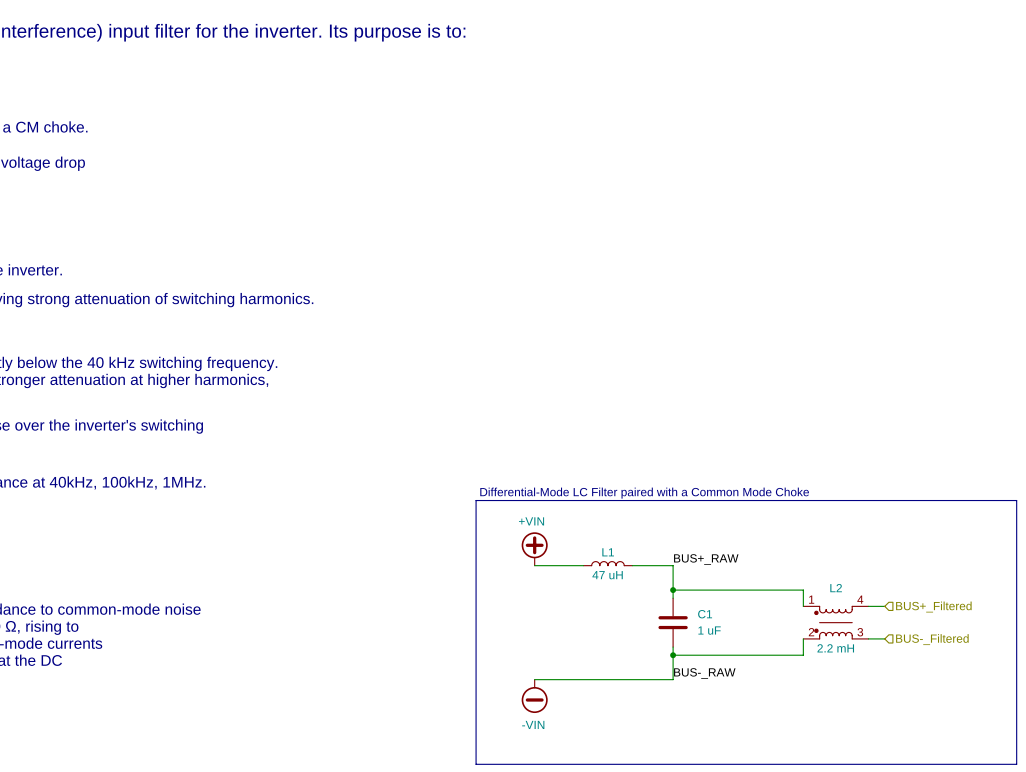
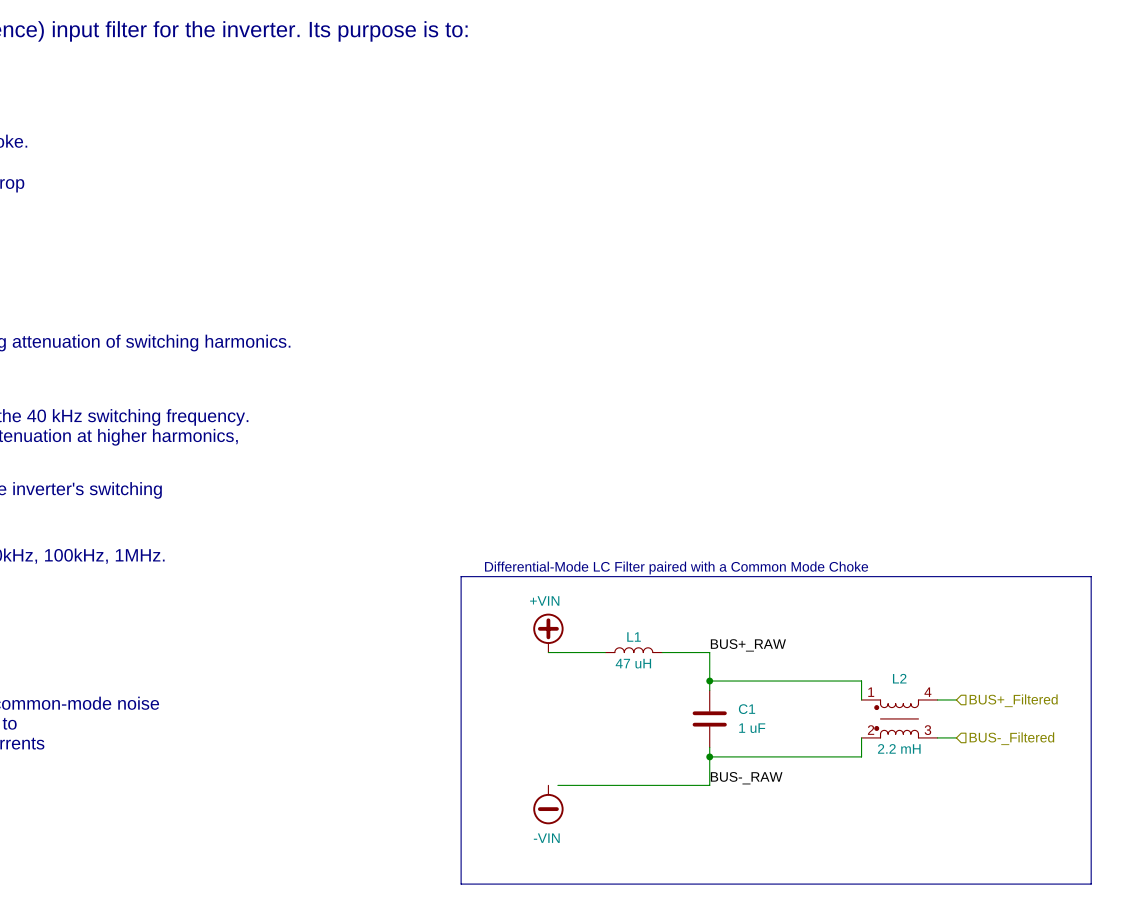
line: (476, 500) (476, 764) -> (480, 576) (461, 576) (461, 884) (480, 884)
line: (1000, 500) (1016, 500) (1016, 764) (1000, 764) -> (1091, 576) (1091, 884)
wire: (534, 679) (542, 679) -> none

